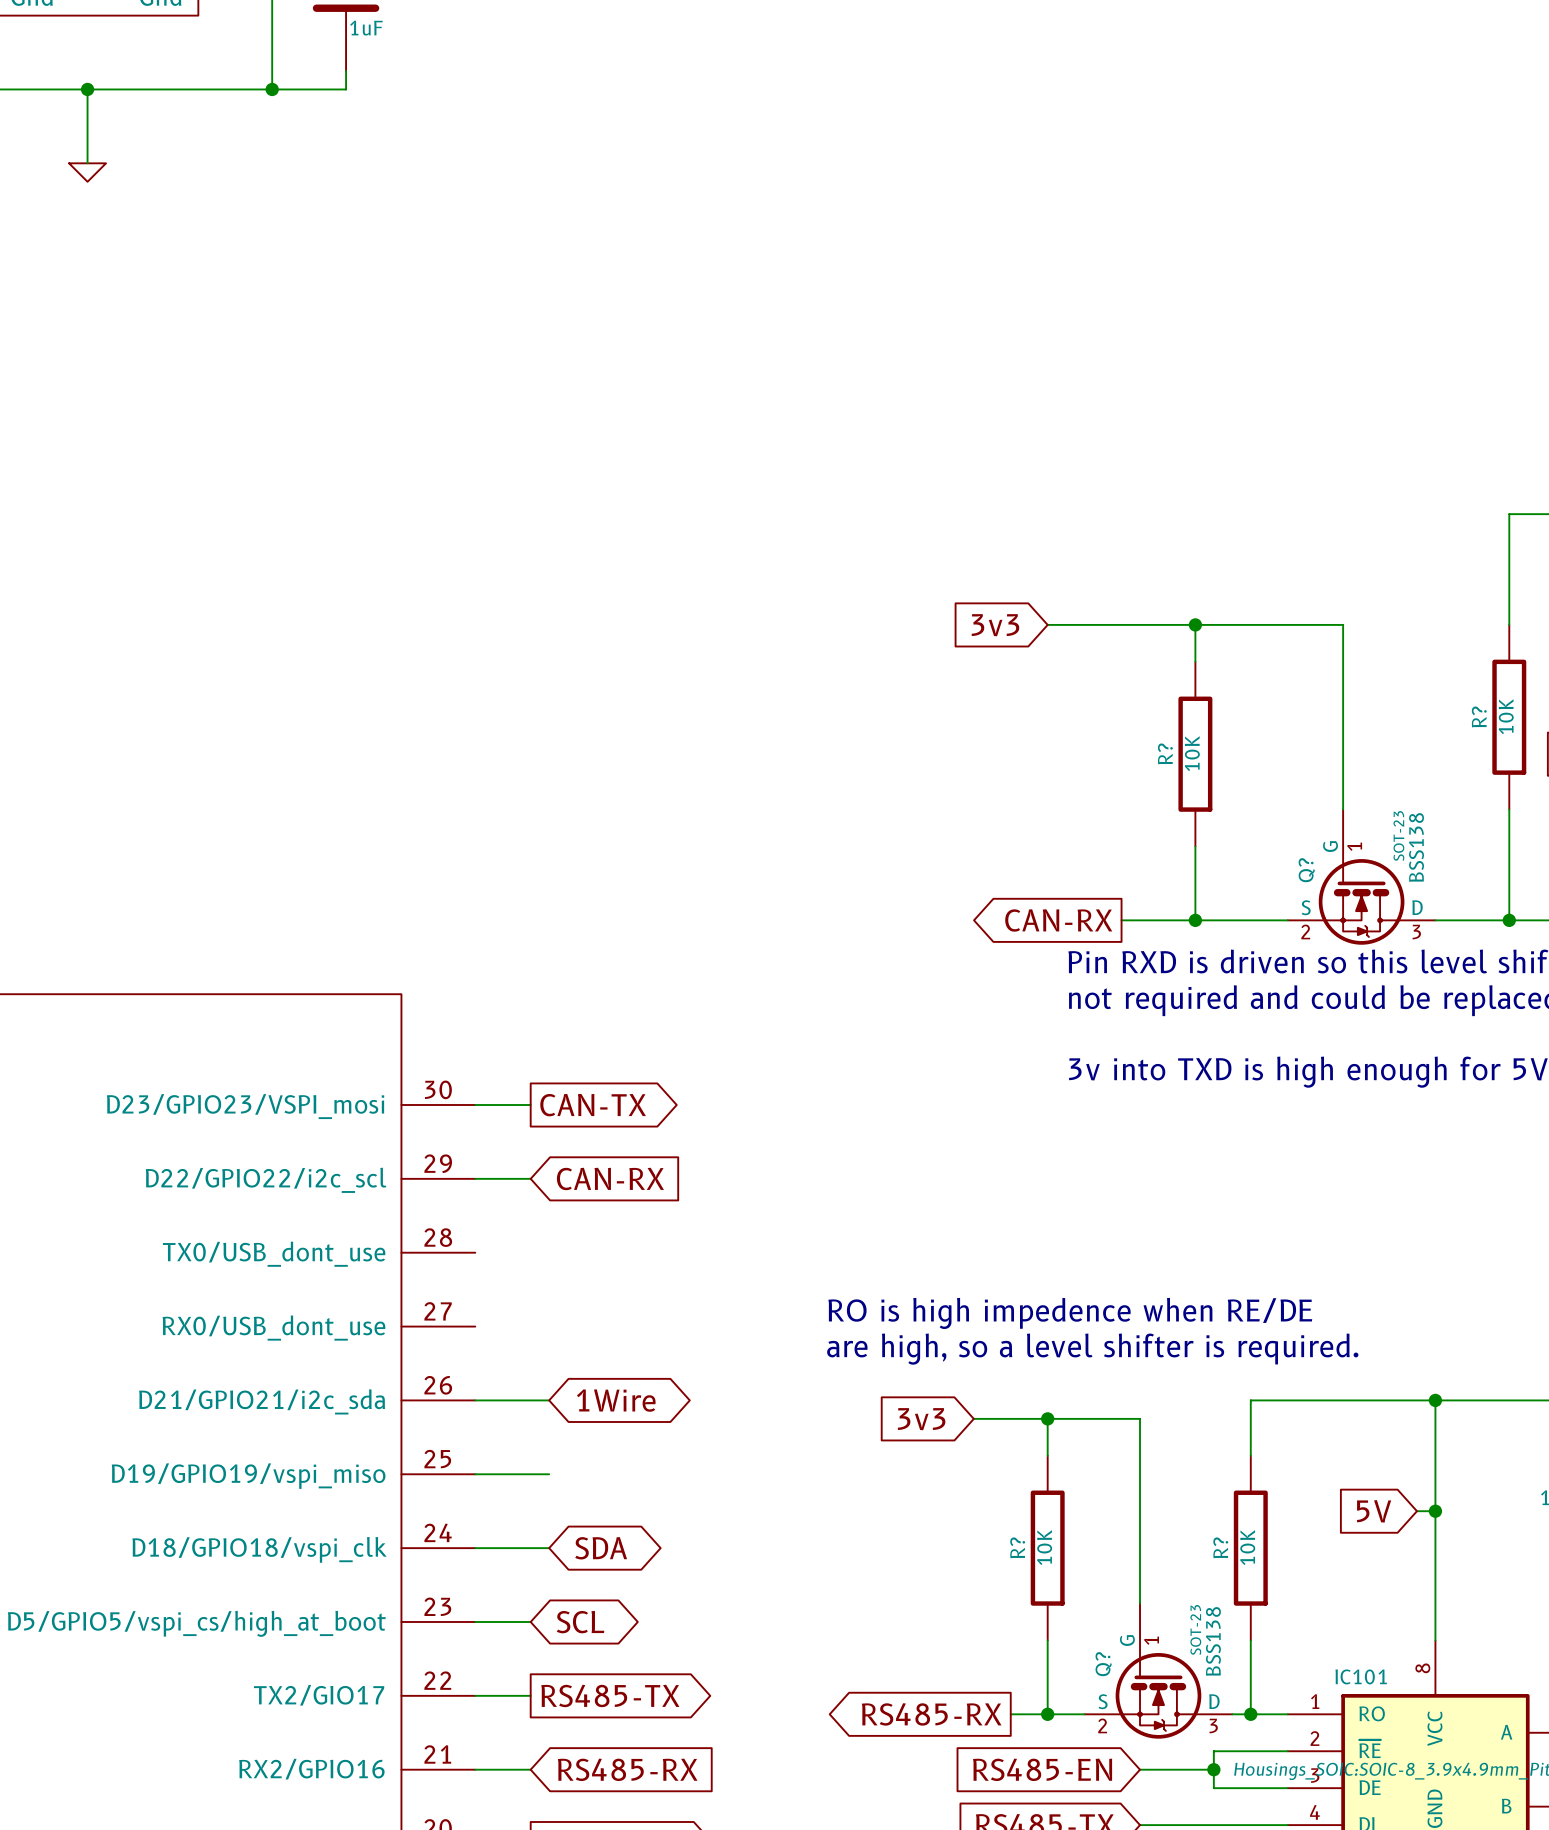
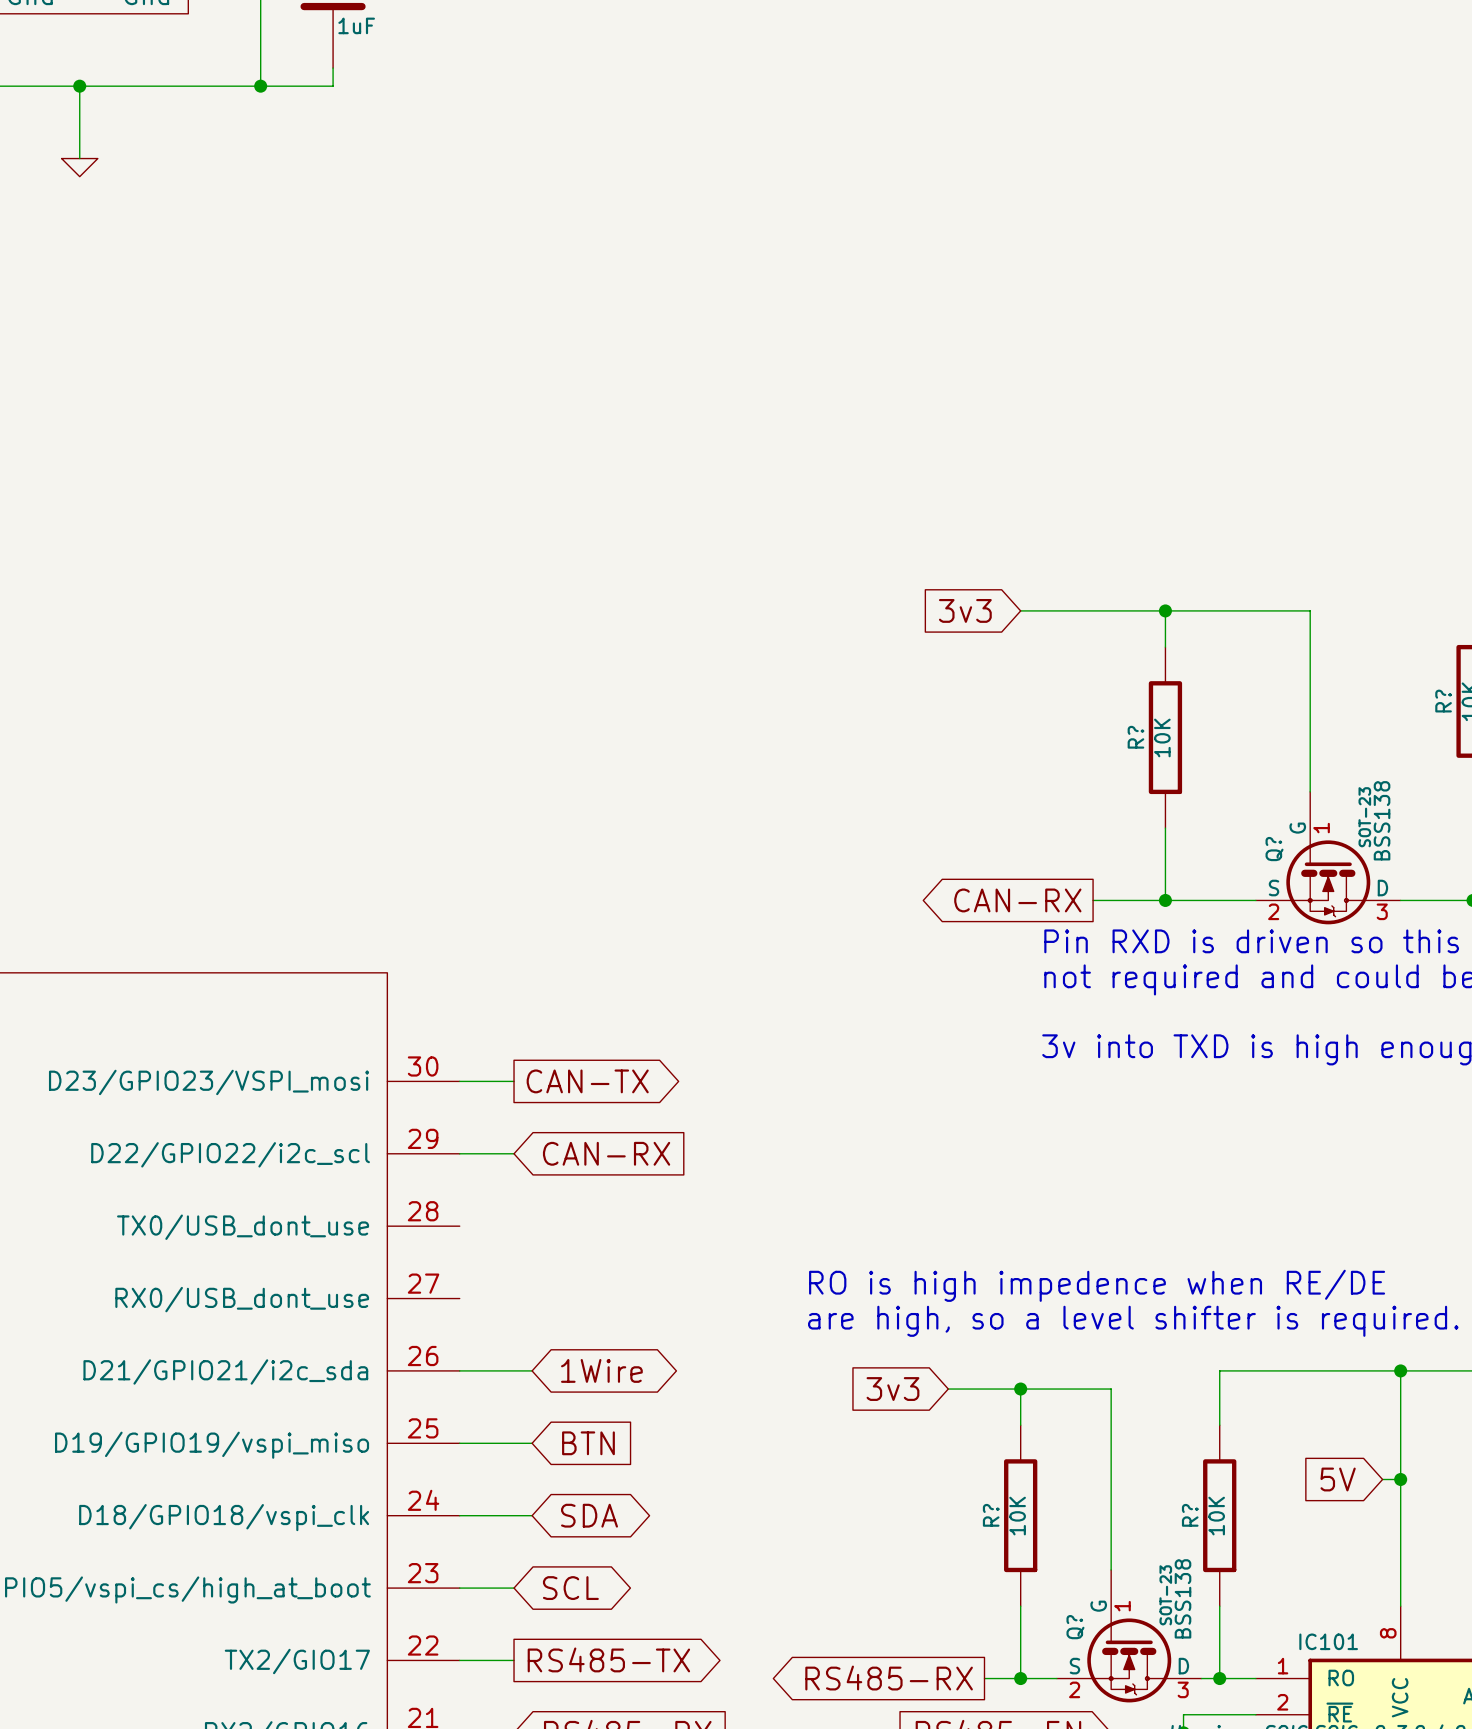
global label: none -> BTN (588, 1443)

